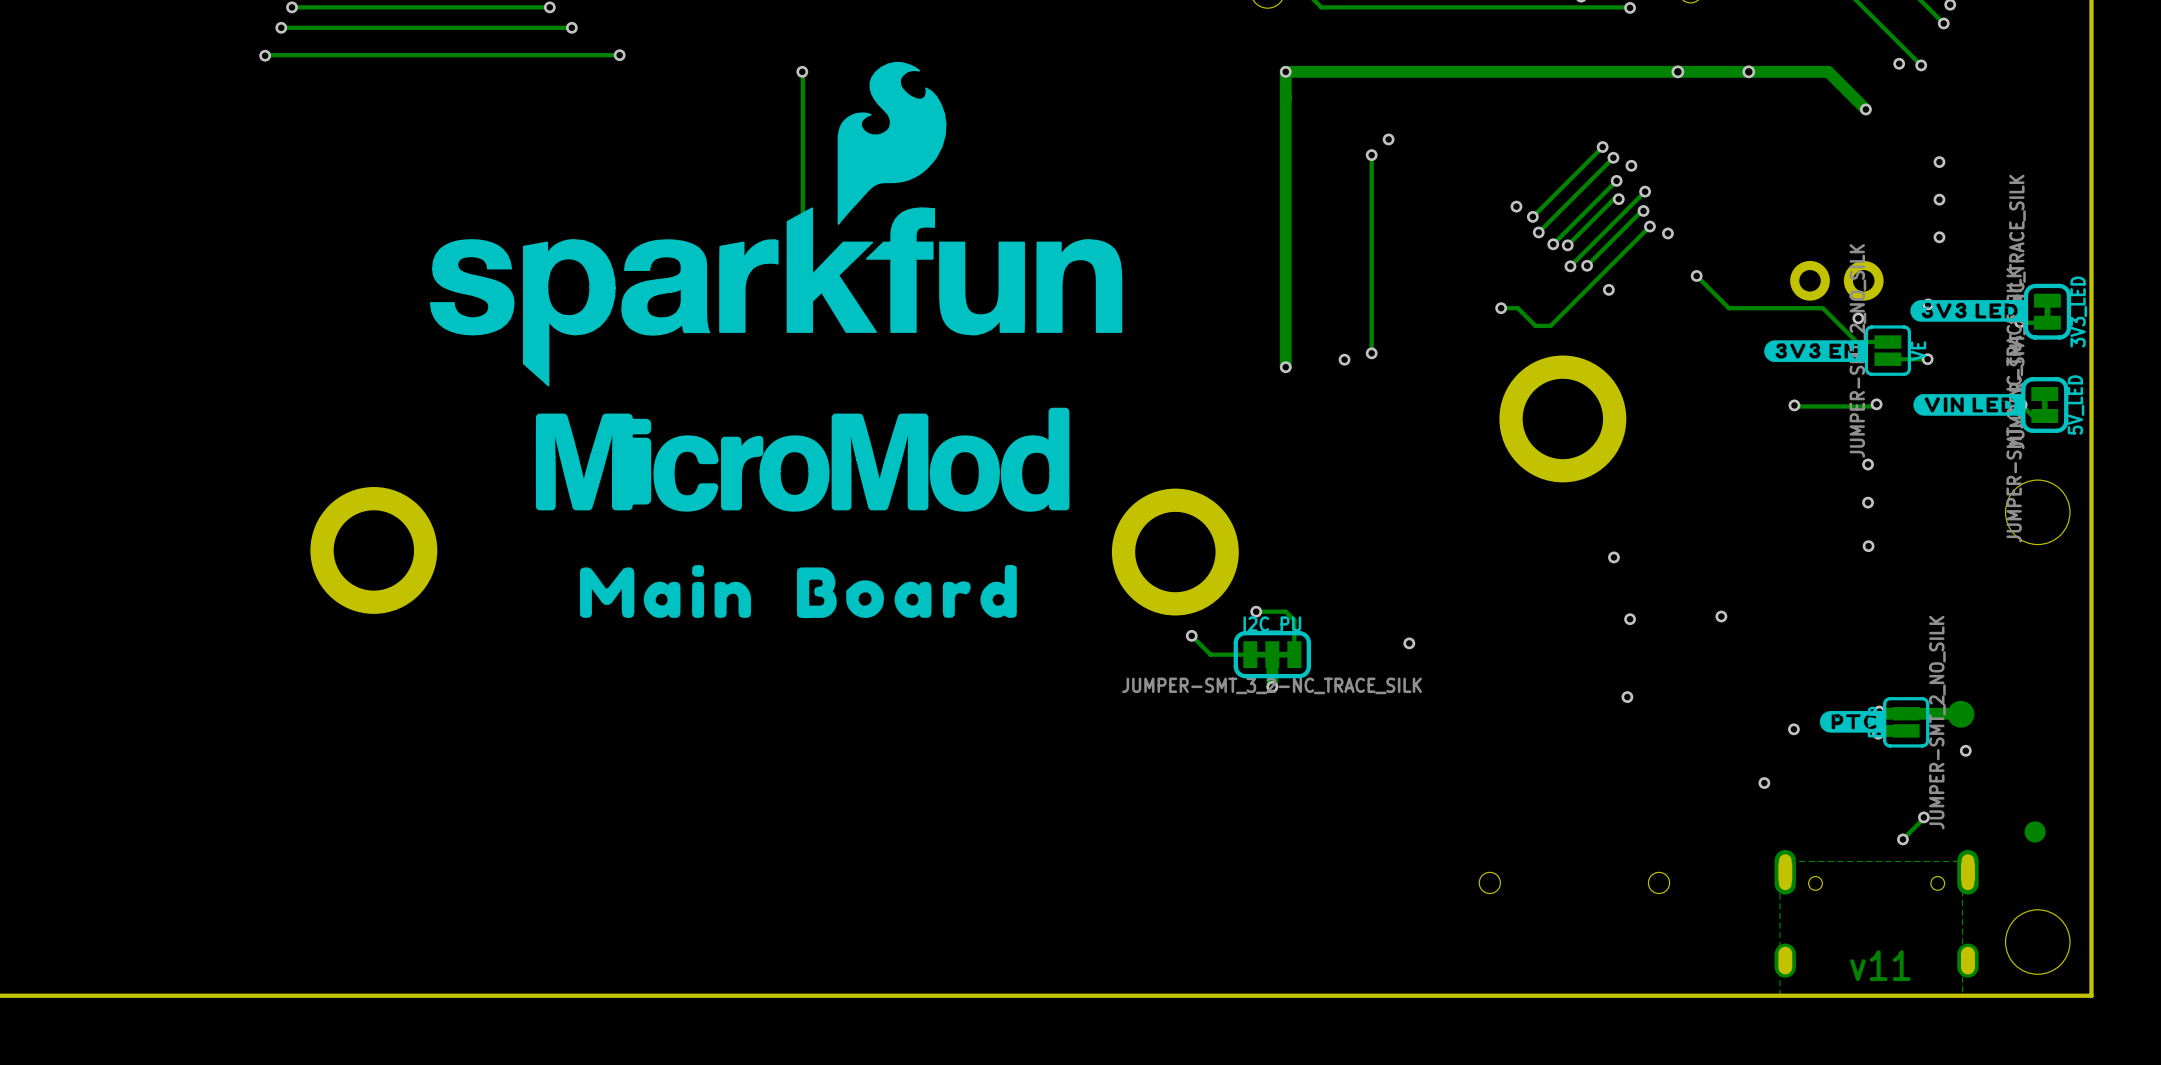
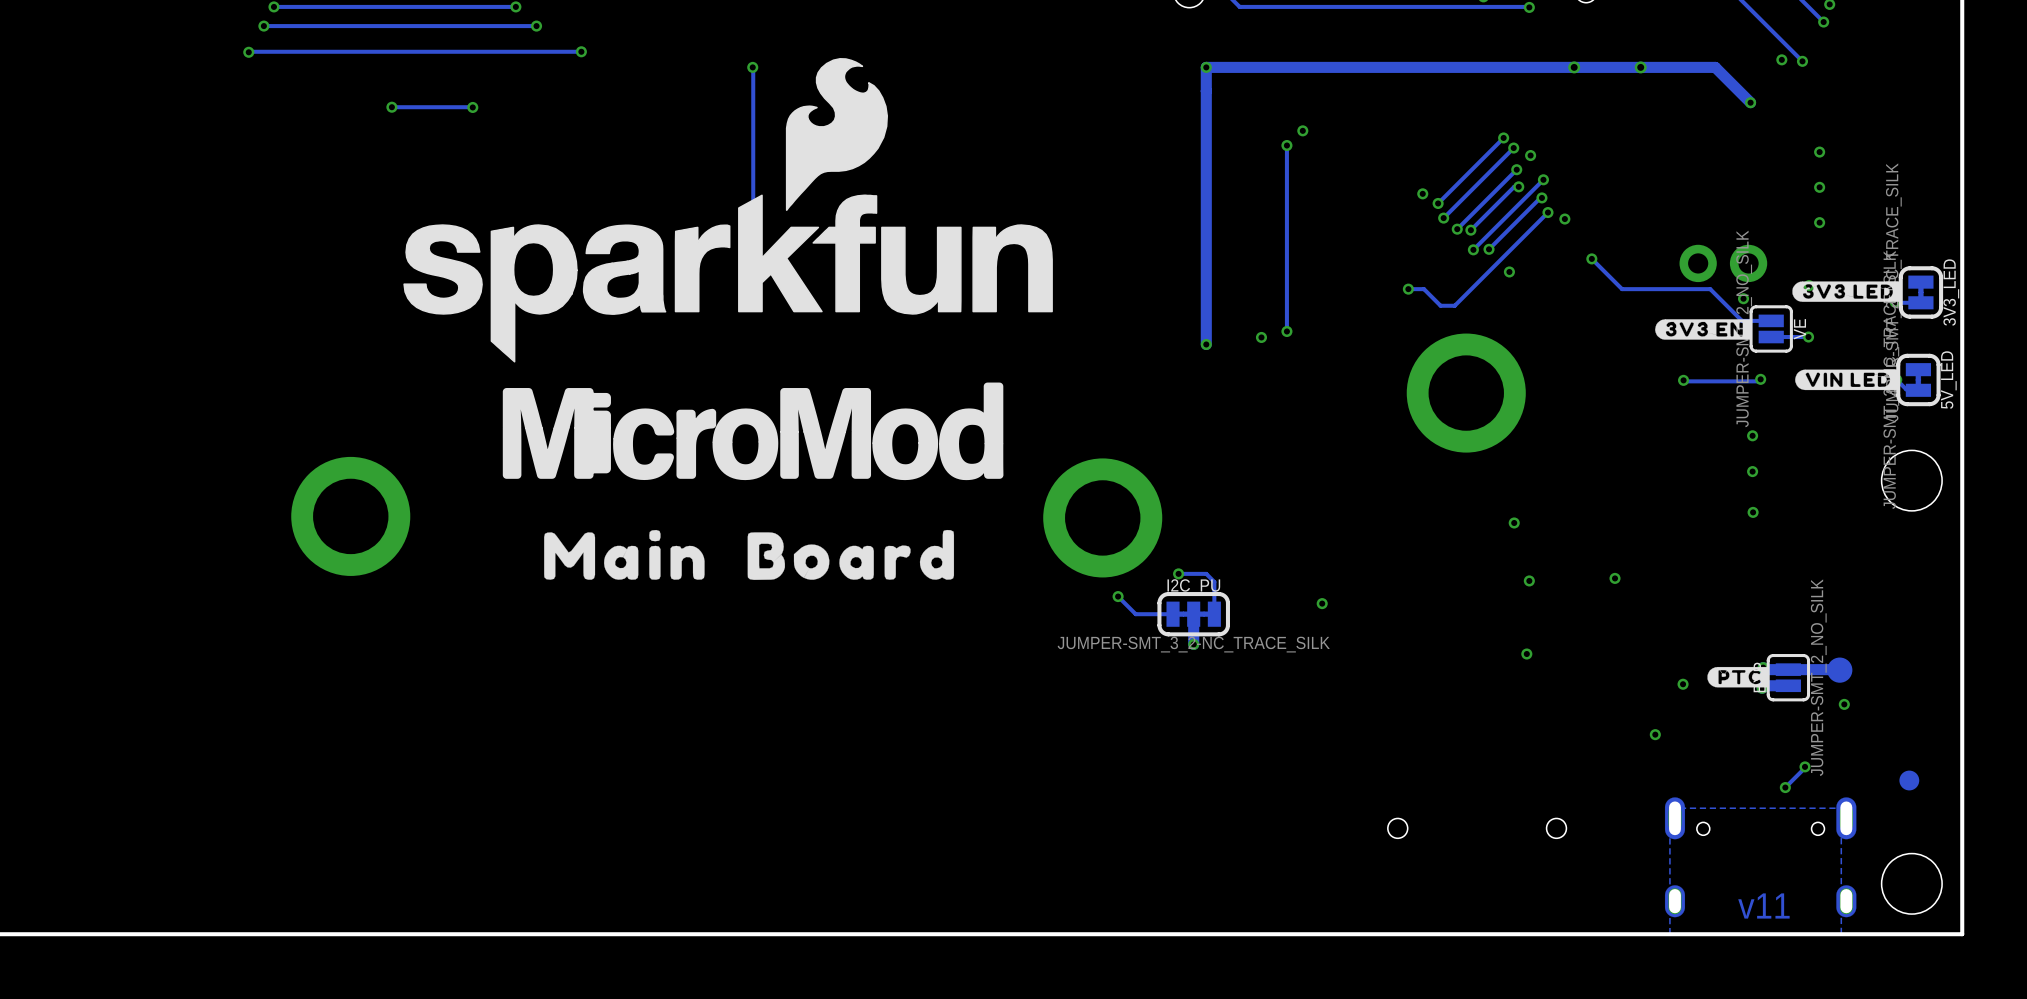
via: none -> (391, 107)
track: none -> (472, 107) (391, 107)
via: none -> (472, 107)

